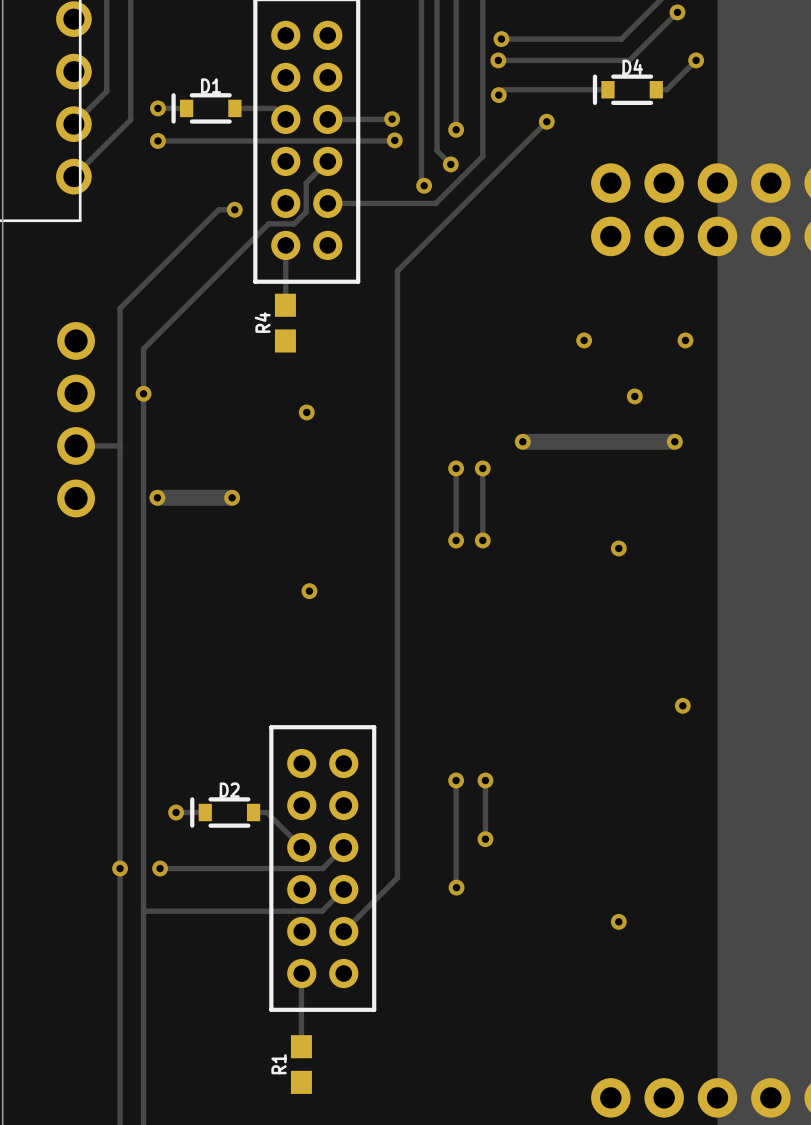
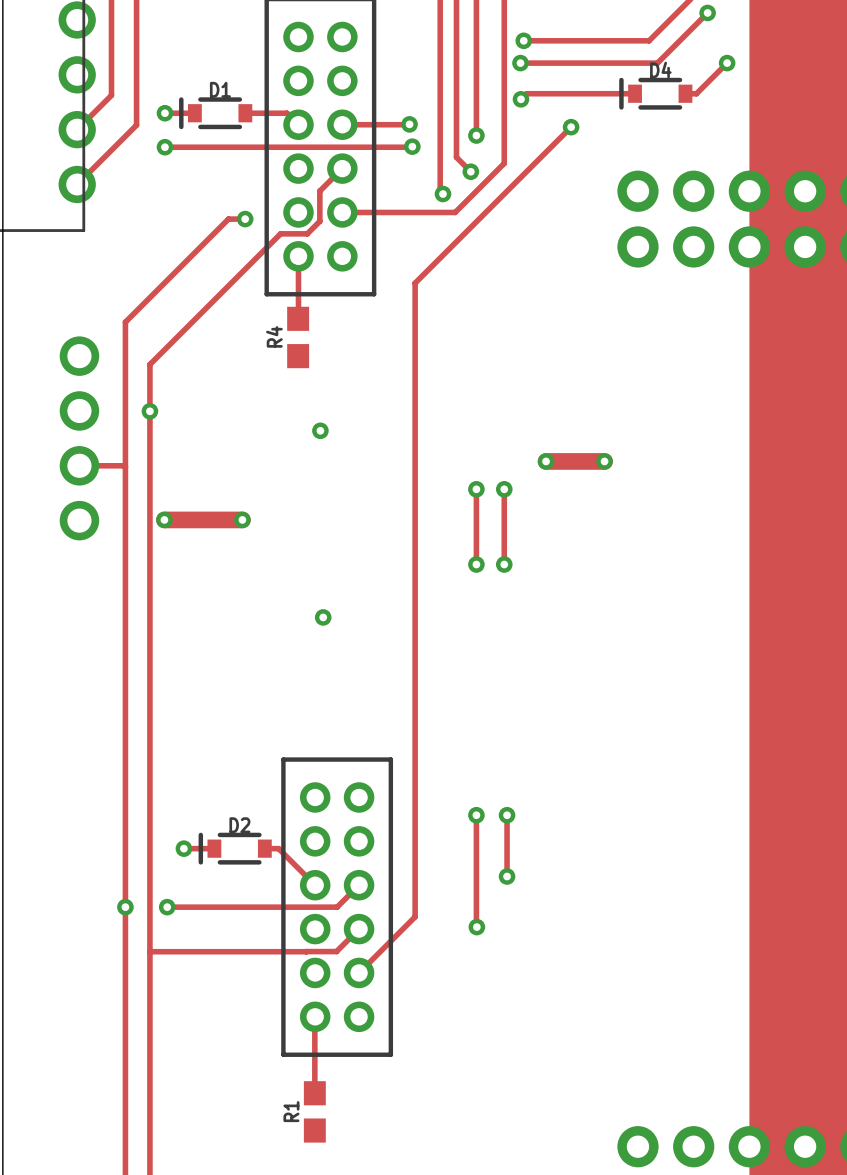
via: (584, 340) -> none
via: (685, 340) -> none
via: (634, 396) -> none
track: (578, 441) (674, 441) -> none
via: none -> (604, 461)
via: (674, 441) -> none
via: (618, 548) -> none
via: (682, 705) -> none
via: (618, 921) -> none

